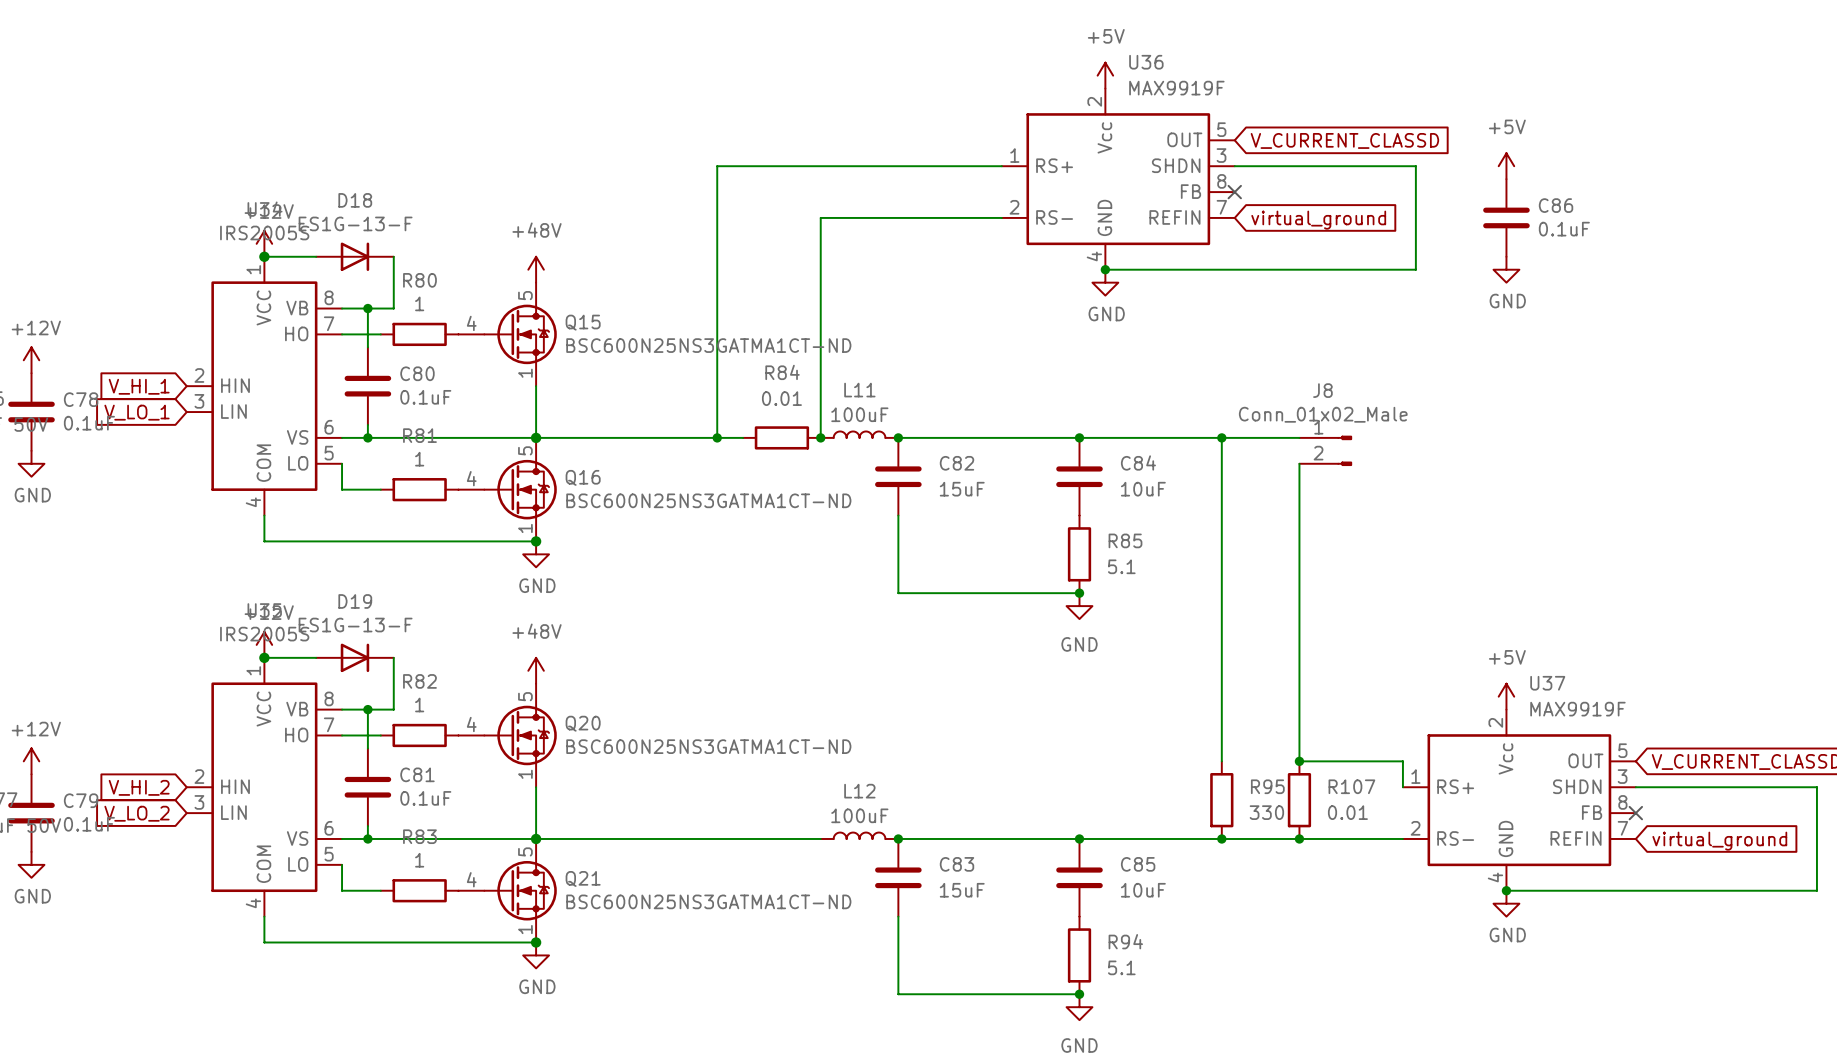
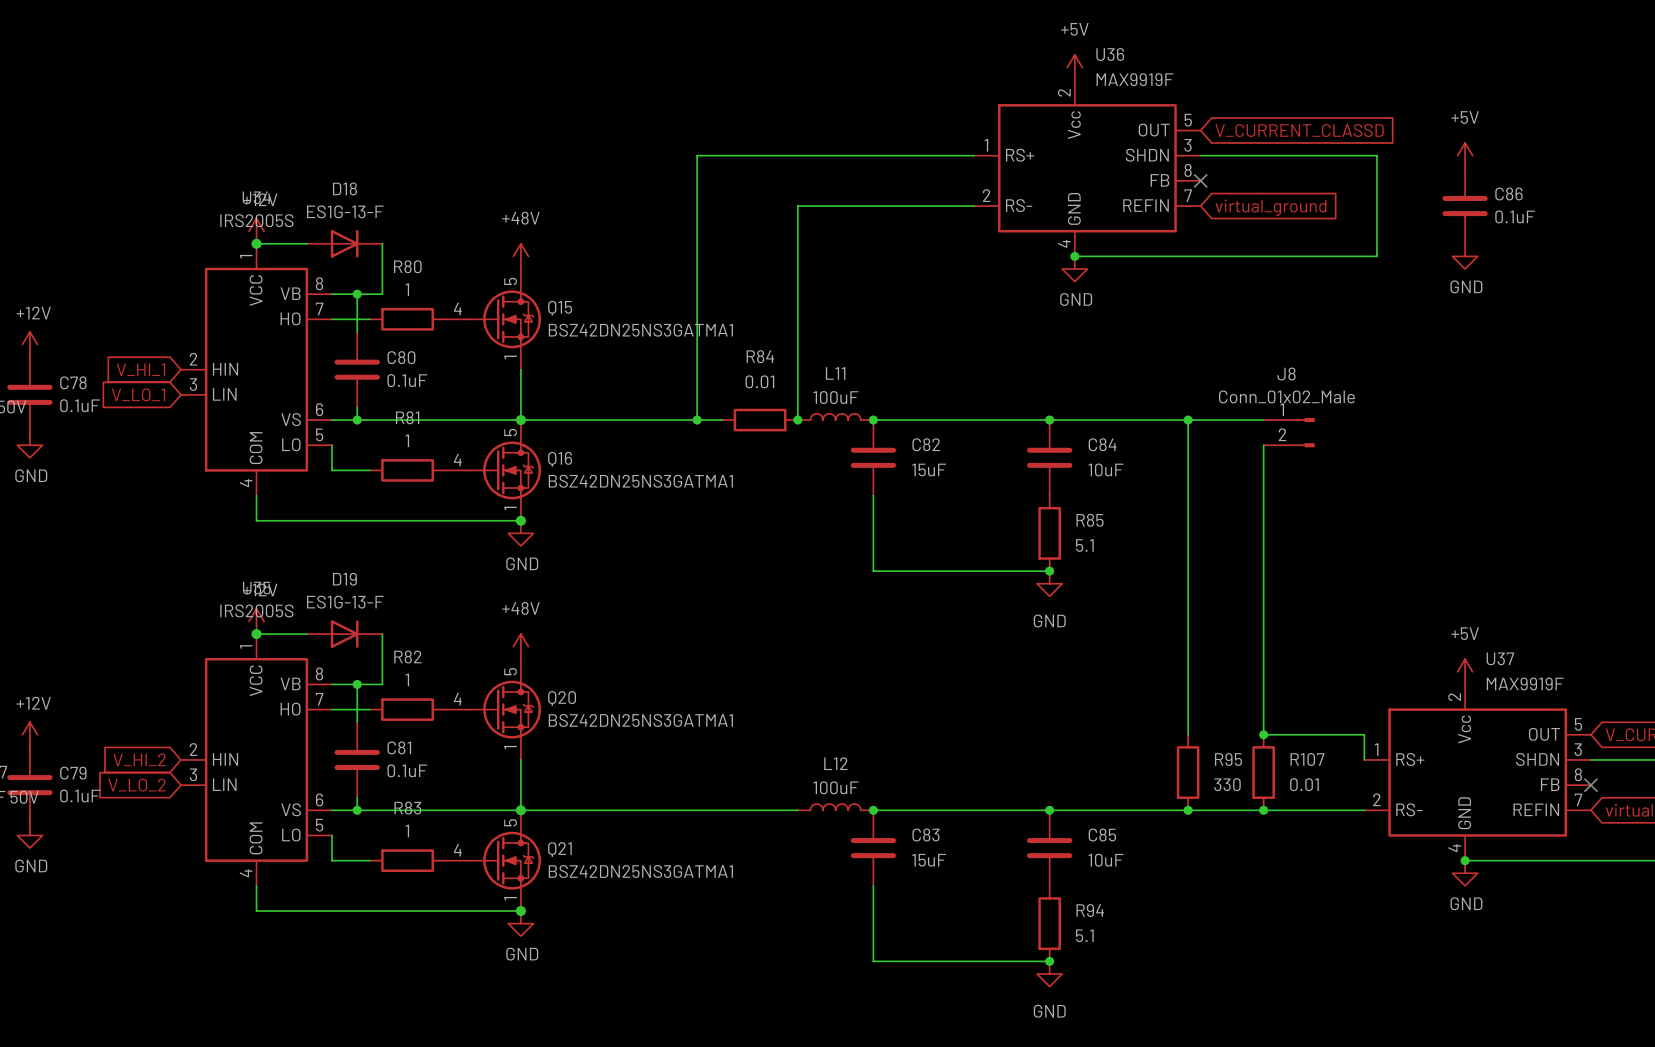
Q15 value: BSC600N25NS3GATMA1CT-ND (708, 345) -> BSZ42DN25NS3GATMA1 (640, 330)
Q16 value: BSC600N25NS3GATMA1CT-ND (708, 500) -> BSZ42DN25NS3GATMA1 (640, 481)
Q20 value: BSC600N25NS3GATMA1CT-ND (708, 746) -> BSZ42DN25NS3GATMA1 (640, 720)
Q21 value: BSC600N25NS3GATMA1CT-ND (708, 901) -> BSZ42DN25NS3GATMA1 (640, 871)

